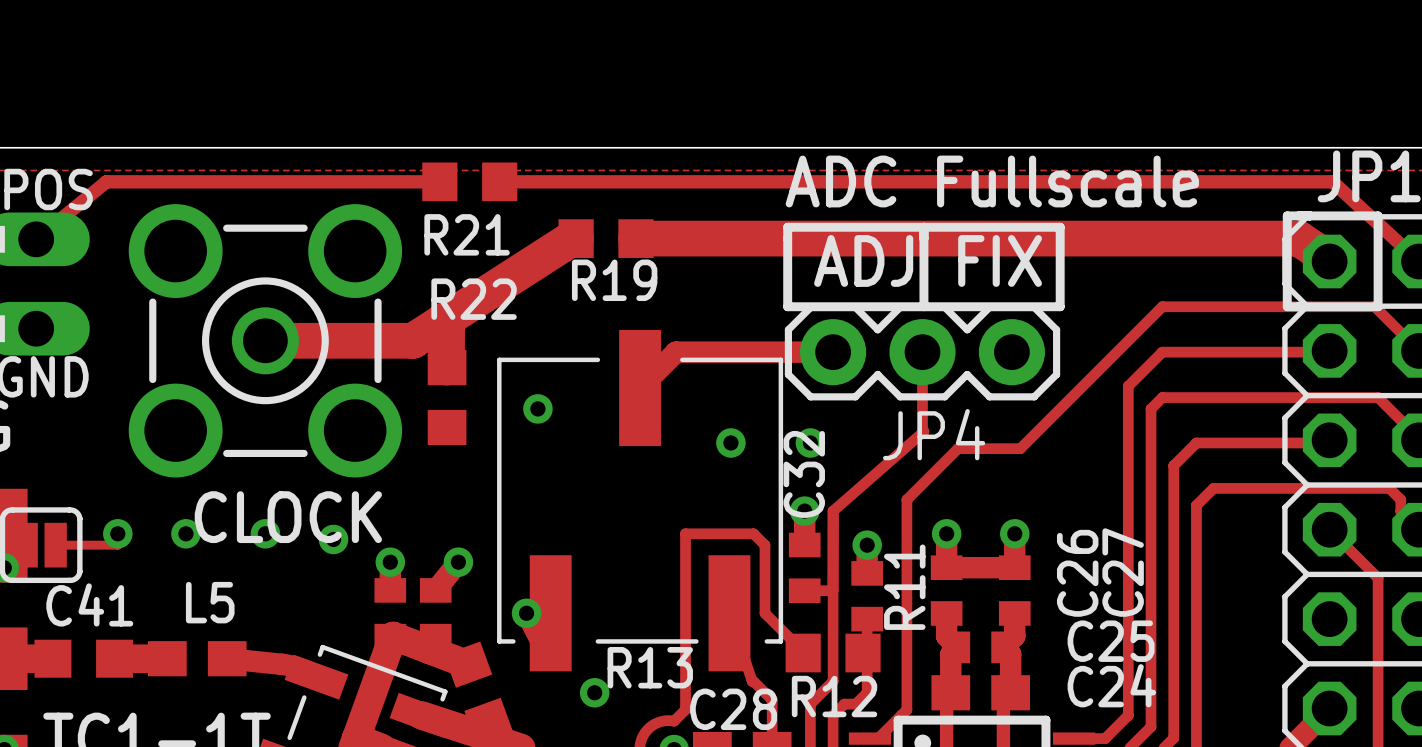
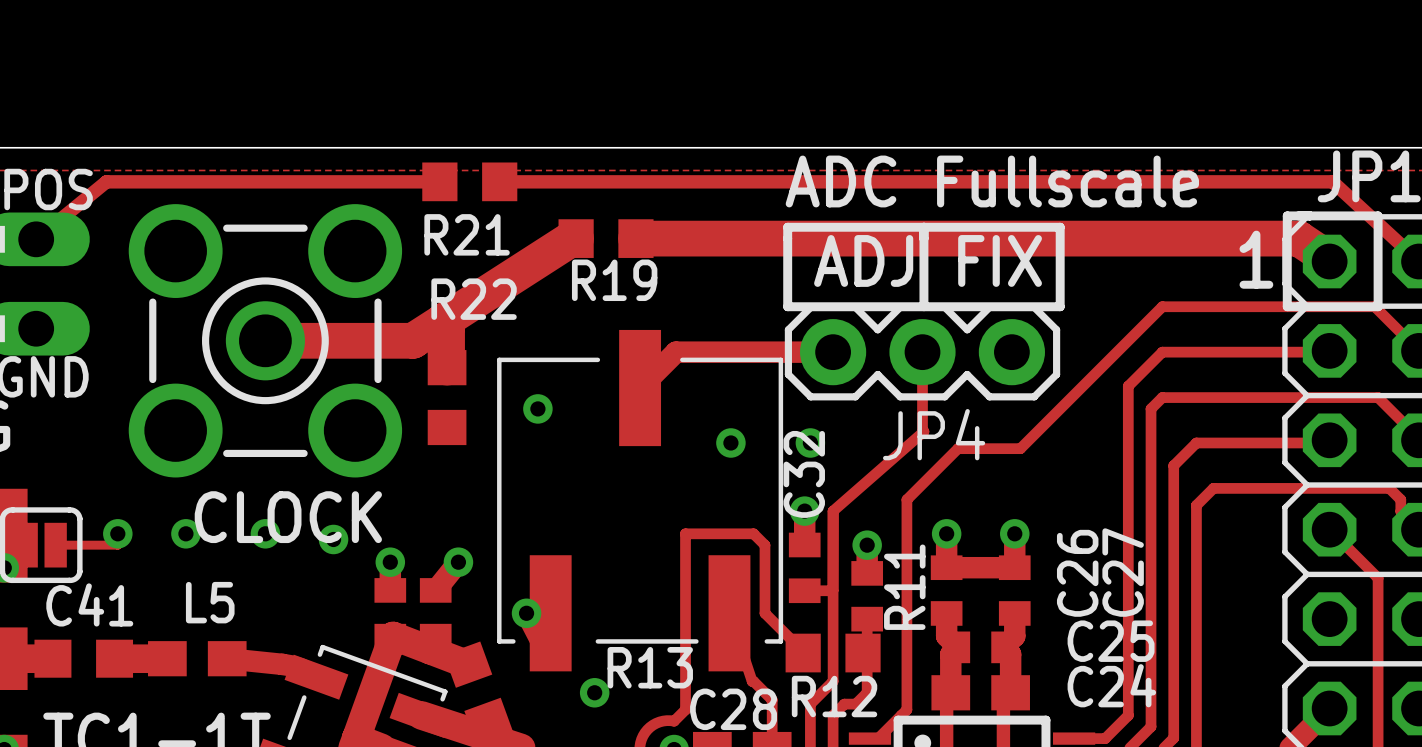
part footprint: [128, 204, 403, 478] -> [128, 204, 403, 478]
text: none -> 1 (1256, 259)

